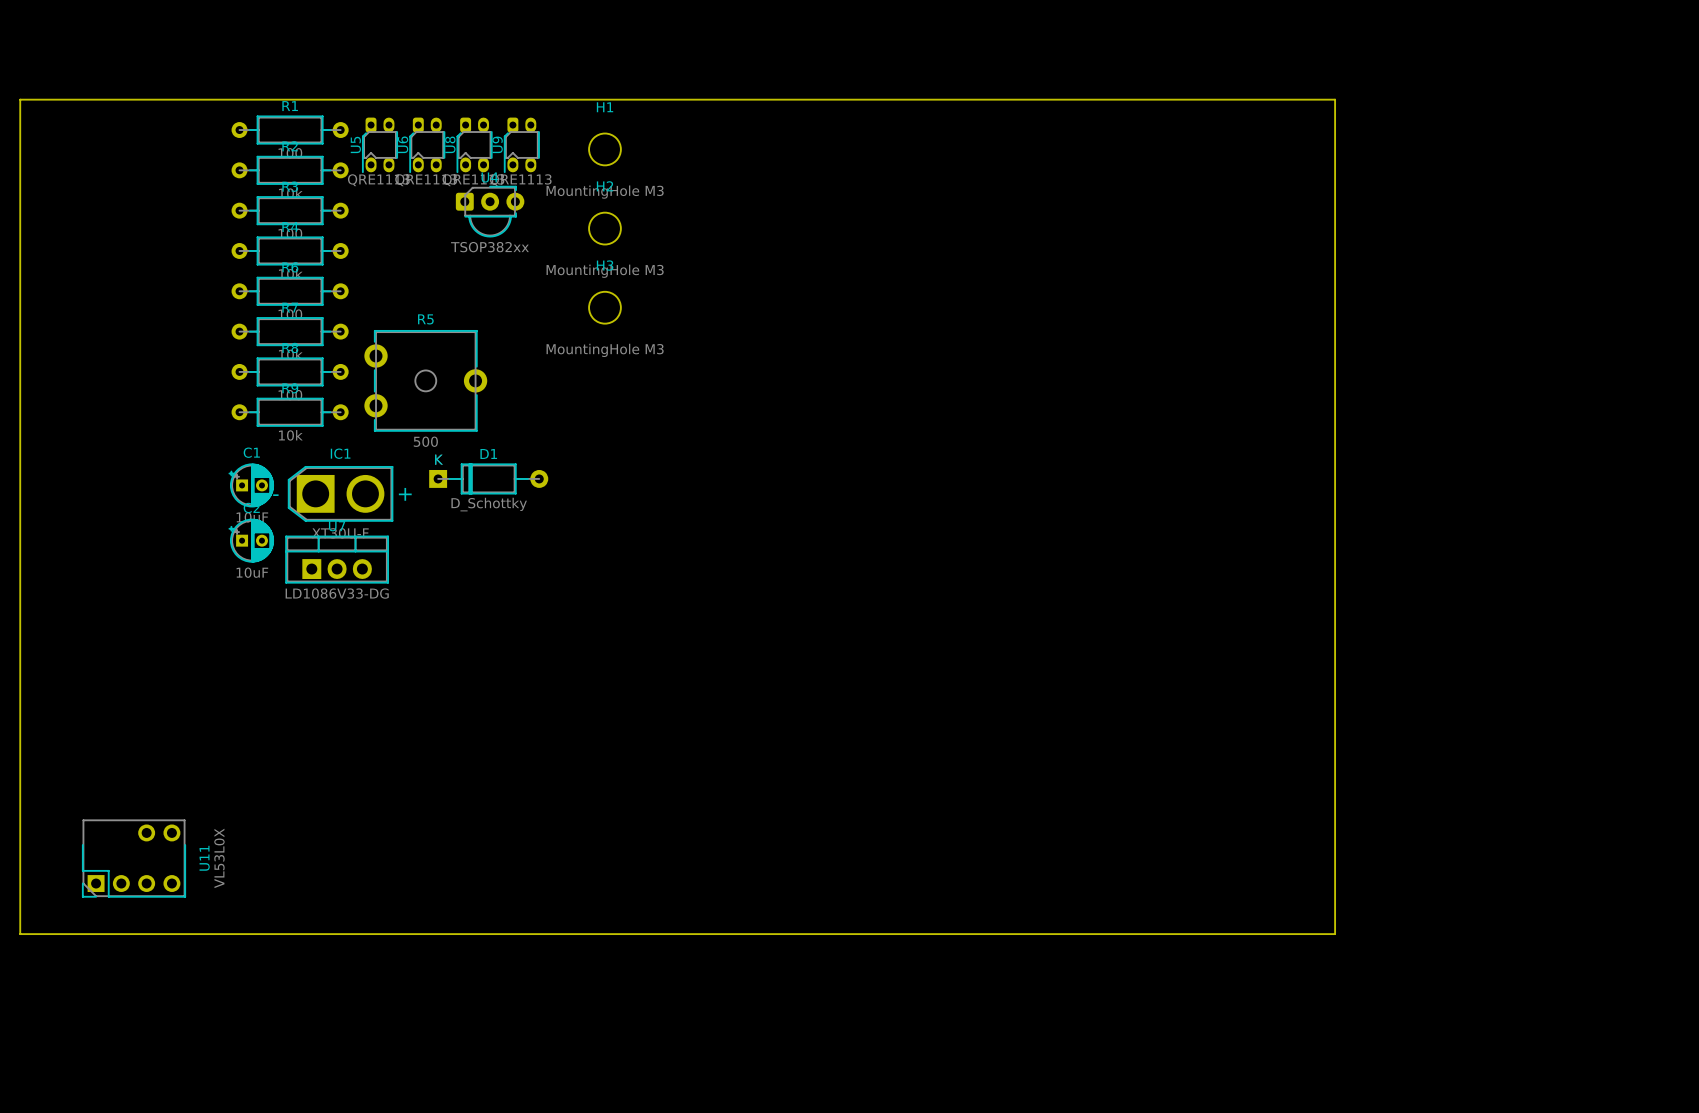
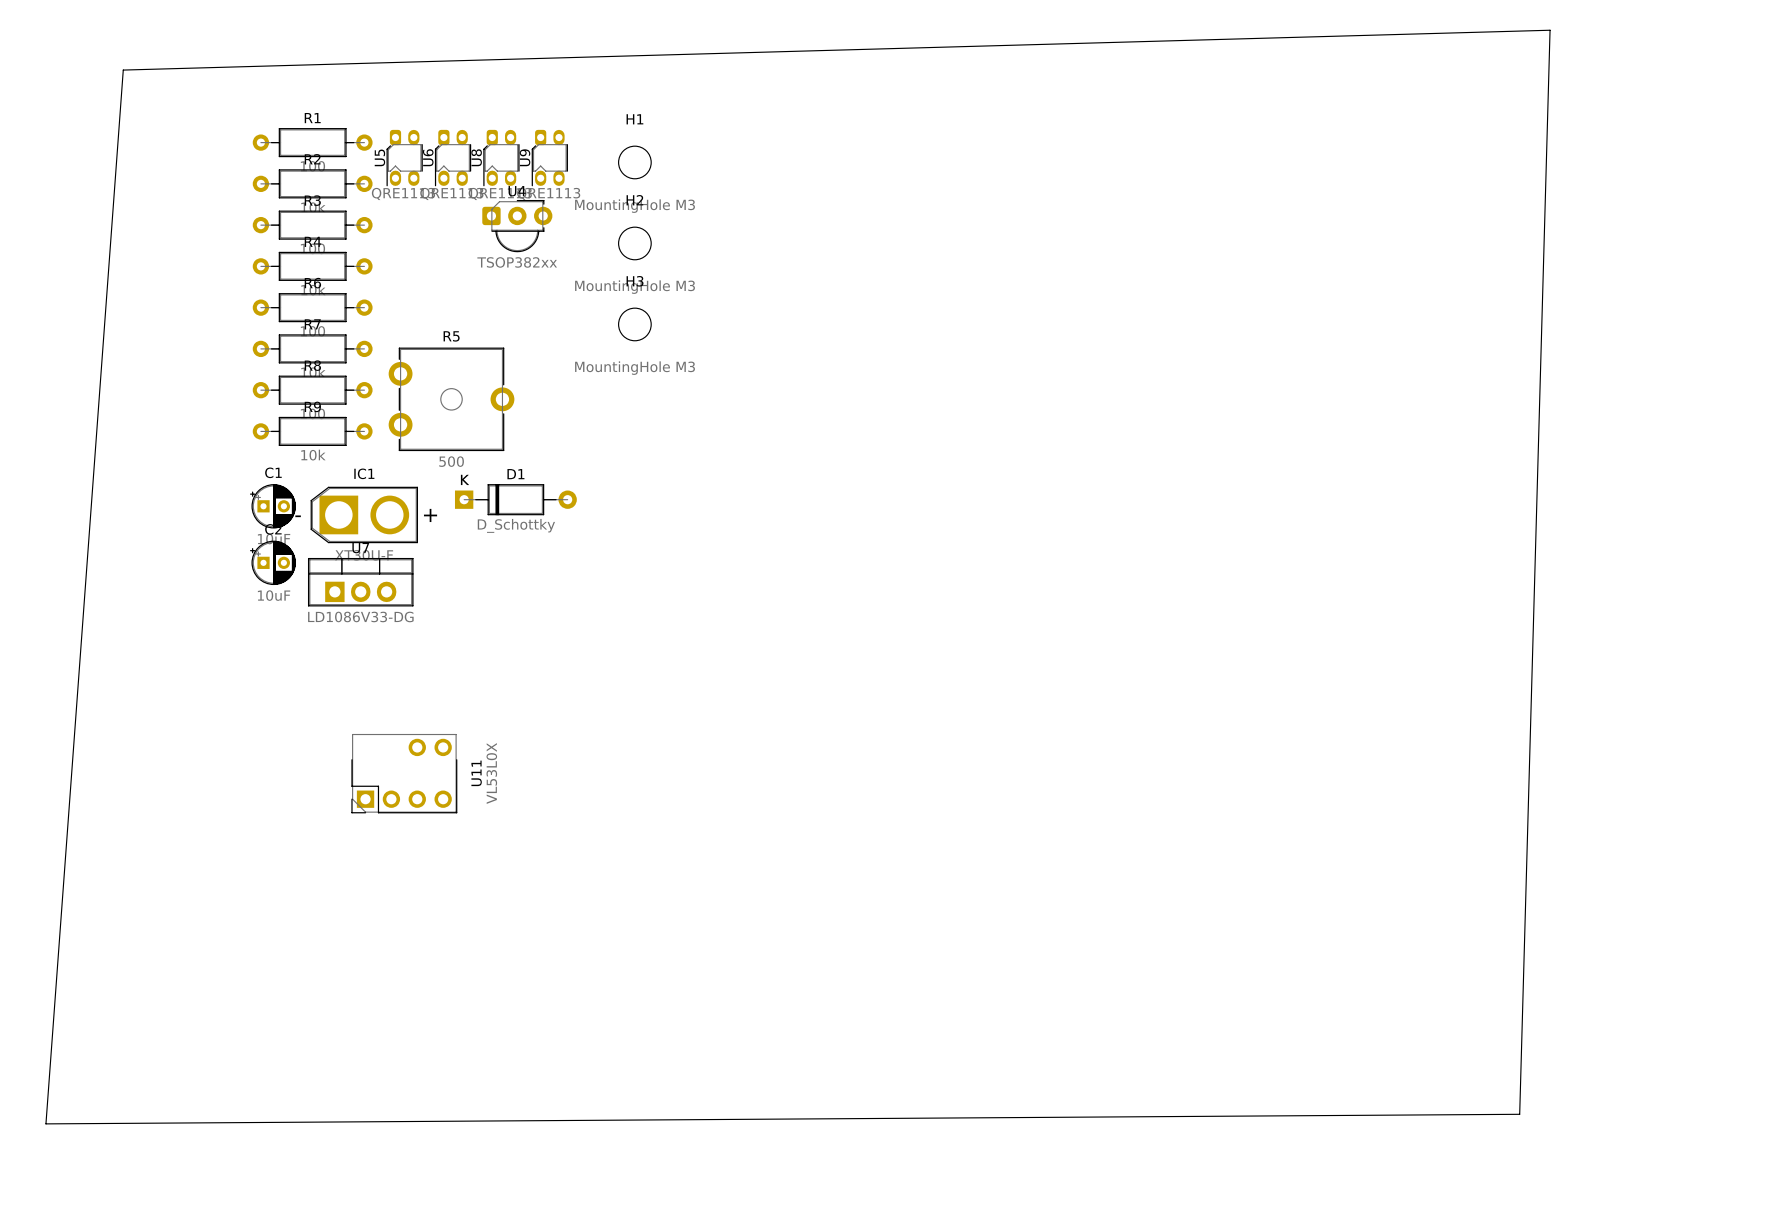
board edge: (20, 99) (1335, 99) (1335, 934) (20, 934) (20, 99) -> (1550, 30) (123, 70) (45, 1123) (1519, 1114) (1550, 30)
U11 position: (134, 858) -> (404, 773)

